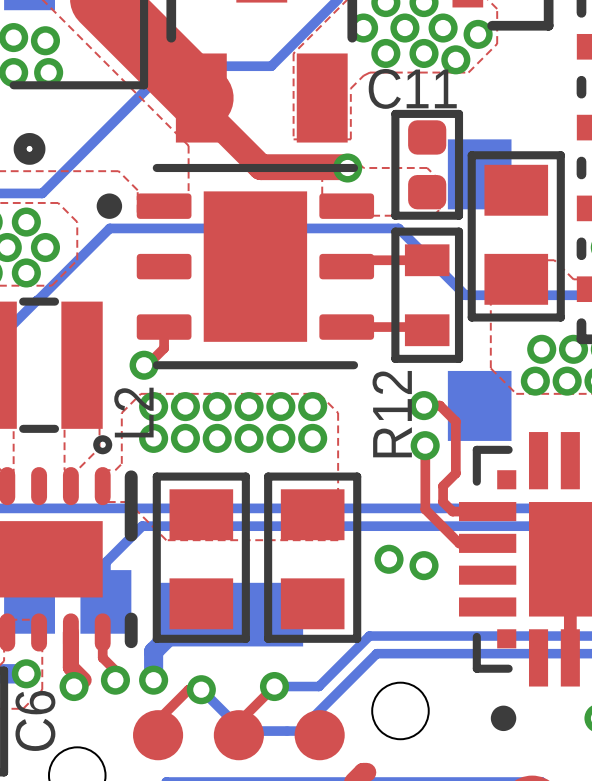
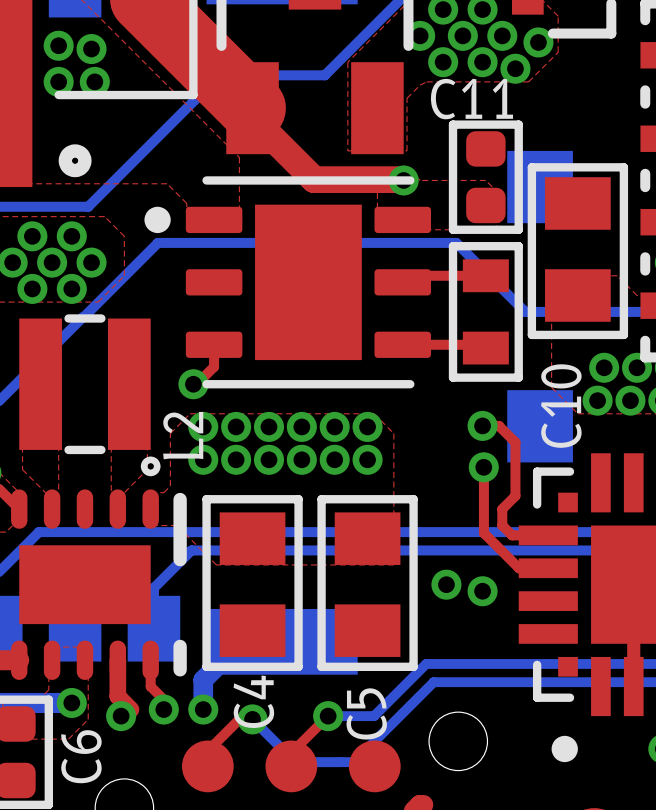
C10 name: none -> C10 (561, 406)
R12 name: R12 (392, 414) -> none
C4 name: none -> C4 (253, 701)
C5 name: none -> C5 (366, 713)

